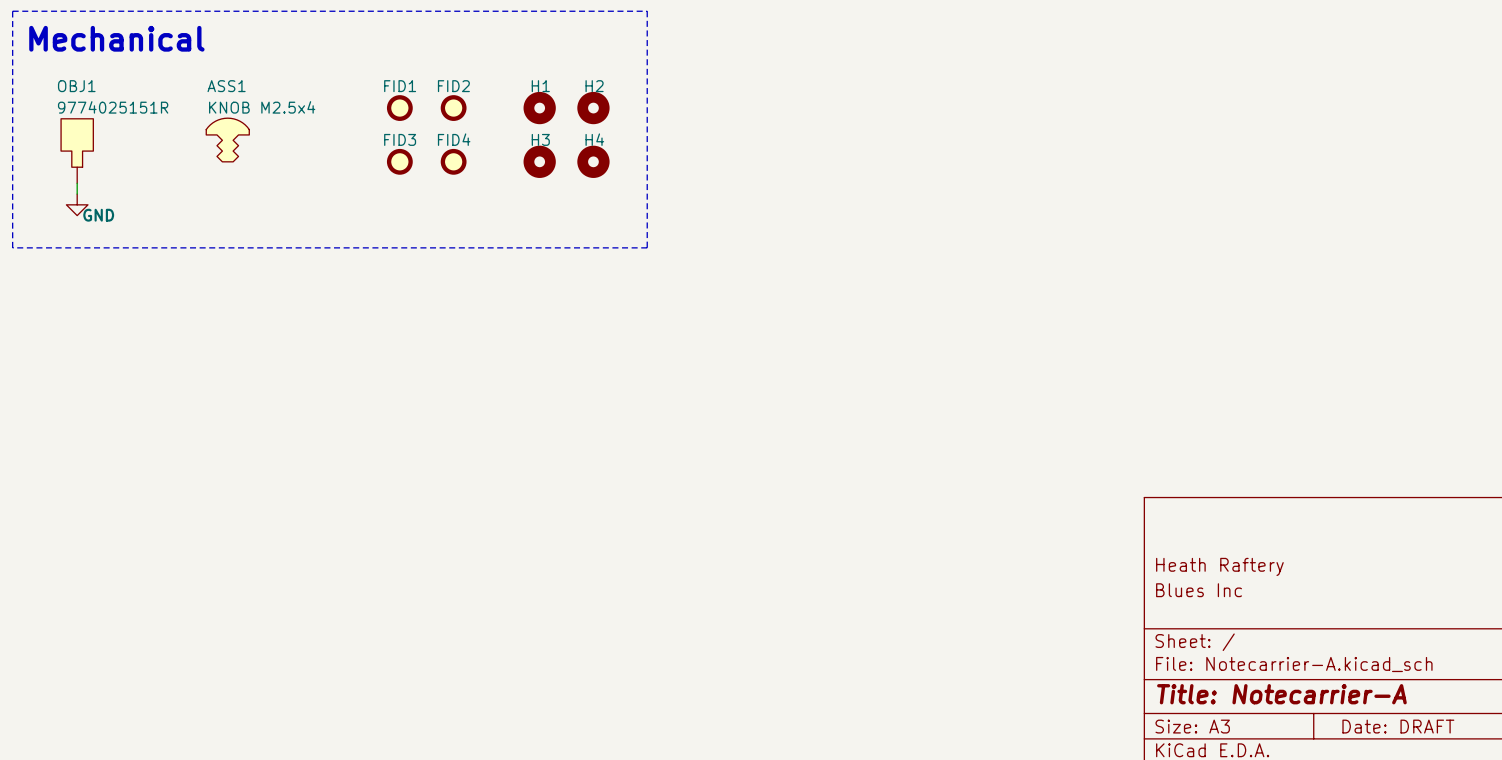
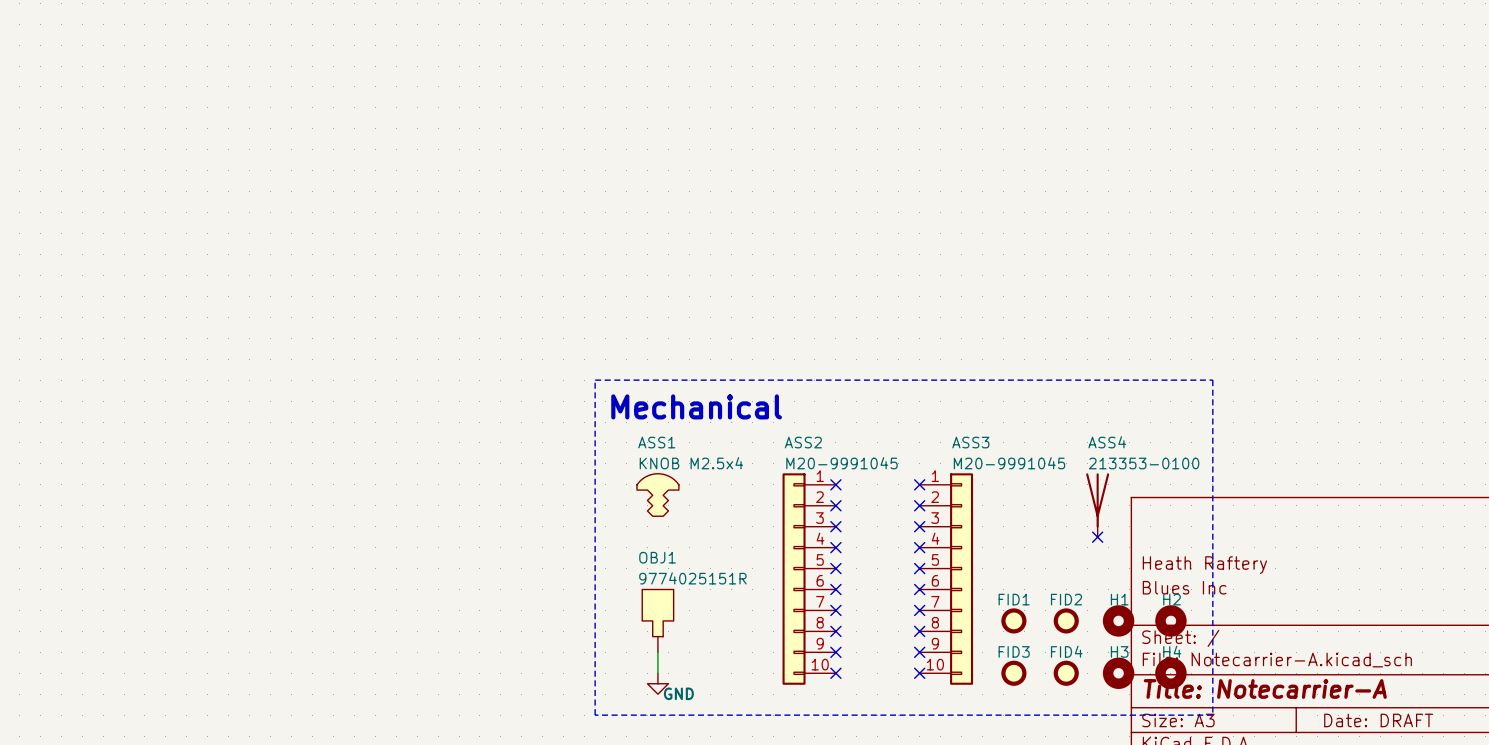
line: (12, 11) (647, 11) (647, 247) (12, 247) (12, 11) -> none
text: Mechanical (116, 38) -> none
FID1 position: (399, 108) -> (1013, 620)
FID2 position: (453, 108) -> (1066, 620)
H1 position: (539, 108) -> (1118, 620)
H2 position: (593, 108) -> (1170, 620)
ASS1 position: (227, 140) -> (657, 494)
OBJ1 position: (77, 151) -> (657, 620)
FID3 position: (399, 161) -> (1013, 673)
FID4 position: (453, 161) -> (1066, 673)
H3 position: (539, 161) -> (1118, 673)
H4 position: (593, 161) -> (1170, 673)
wire: (77, 183) (77, 194) -> none
power symbol: GND (77, 204) -> none
line: none -> (595, 380) (1212, 380) (1212, 715) (595, 715) (595, 380)
text: none -> Mechanical (696, 406)
no-connect mark: none -> (835, 484)
no-connect mark: none -> (919, 484)
ASS4: none -> 213353-0100 (1097, 505)
no-connect mark: none -> (835, 505)
no-connect mark: none -> (919, 505)
no-connect mark: none -> (835, 526)
no-connect mark: none -> (919, 526)
no-connect mark: none -> (1097, 537)
no-connect mark: none -> (835, 547)
no-connect mark: none -> (919, 547)
no-connect mark: none -> (835, 568)
no-connect mark: none -> (919, 568)
ASS2: none -> M20-9991045 (809, 579)
ASS3: none -> M20-9991045 (946, 579)
no-connect mark: none -> (835, 589)
no-connect mark: none -> (919, 589)
no-connect mark: none -> (835, 610)
no-connect mark: none -> (919, 610)
no-connect mark: none -> (835, 631)
no-connect mark: none -> (919, 631)
wire: none -> (657, 652) (657, 673)
no-connect mark: none -> (835, 652)
no-connect mark: none -> (919, 652)
no-connect mark: none -> (835, 673)
no-connect mark: none -> (919, 673)
power symbol: none -> GND (657, 683)

